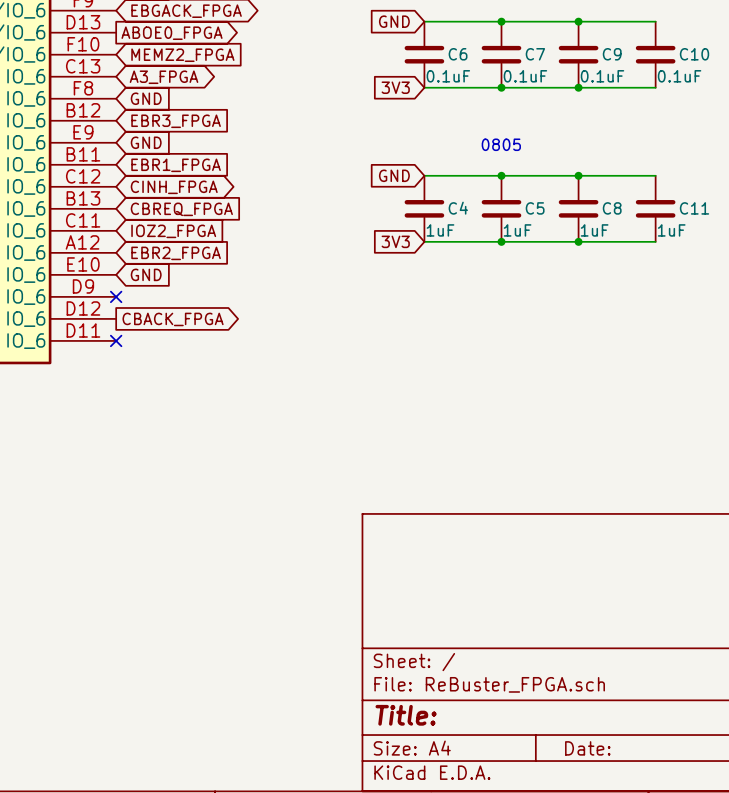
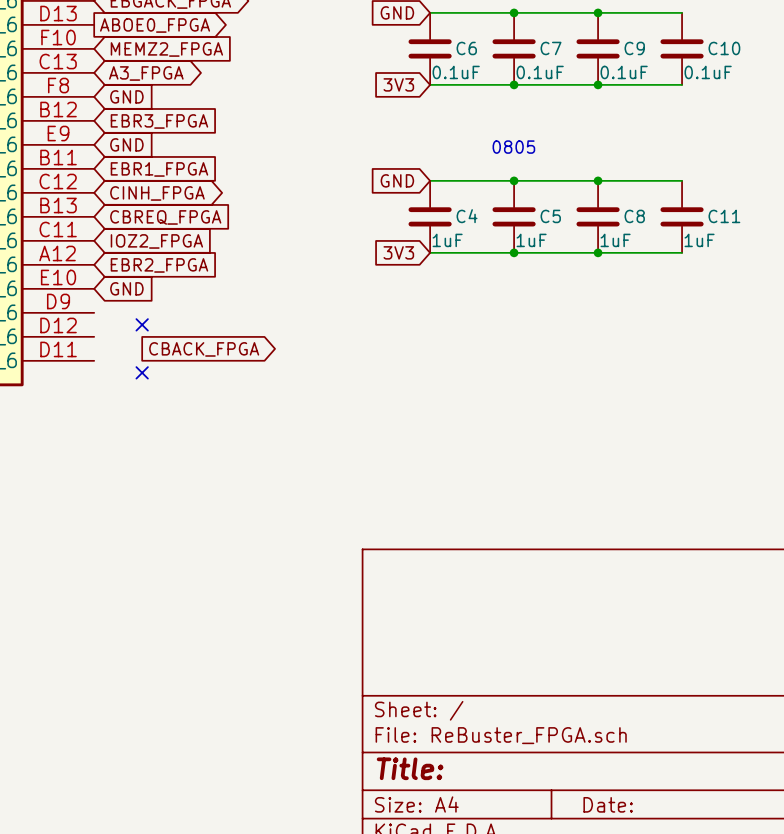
no-connect mark: (116, 296) -> none
no-connect mark: none -> (142, 324)
global label position: CBACK_FPGA (173, 319) -> CBACK_FPGA (204, 349)
no-connect mark: (116, 340) -> none
no-connect mark: none -> (142, 372)

